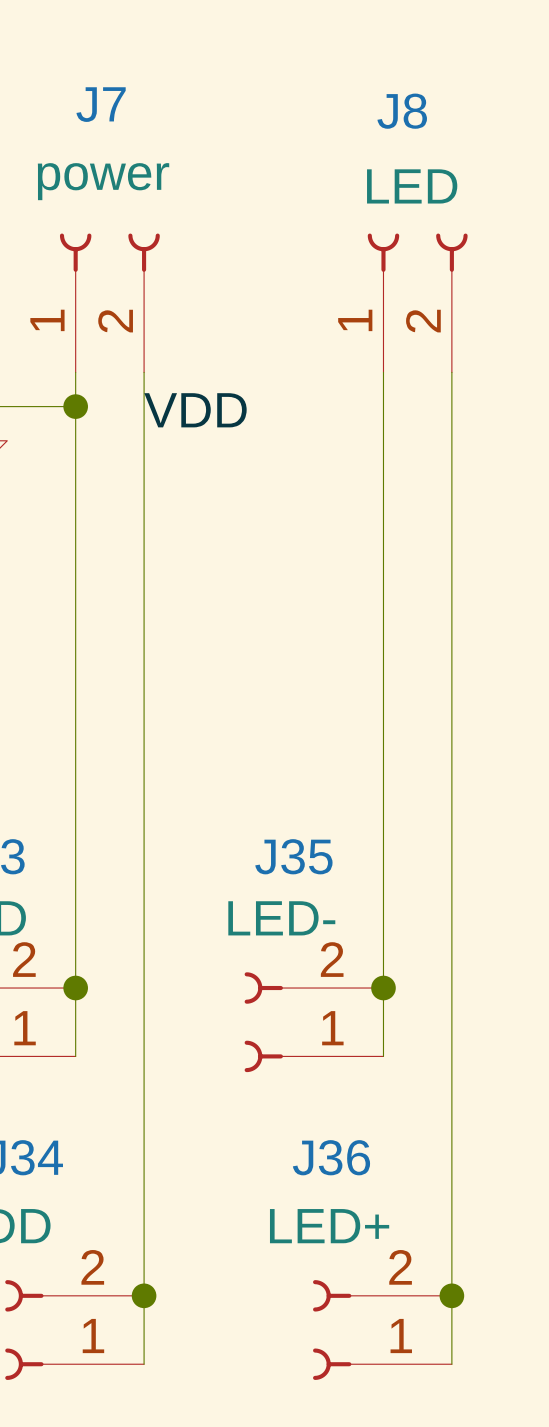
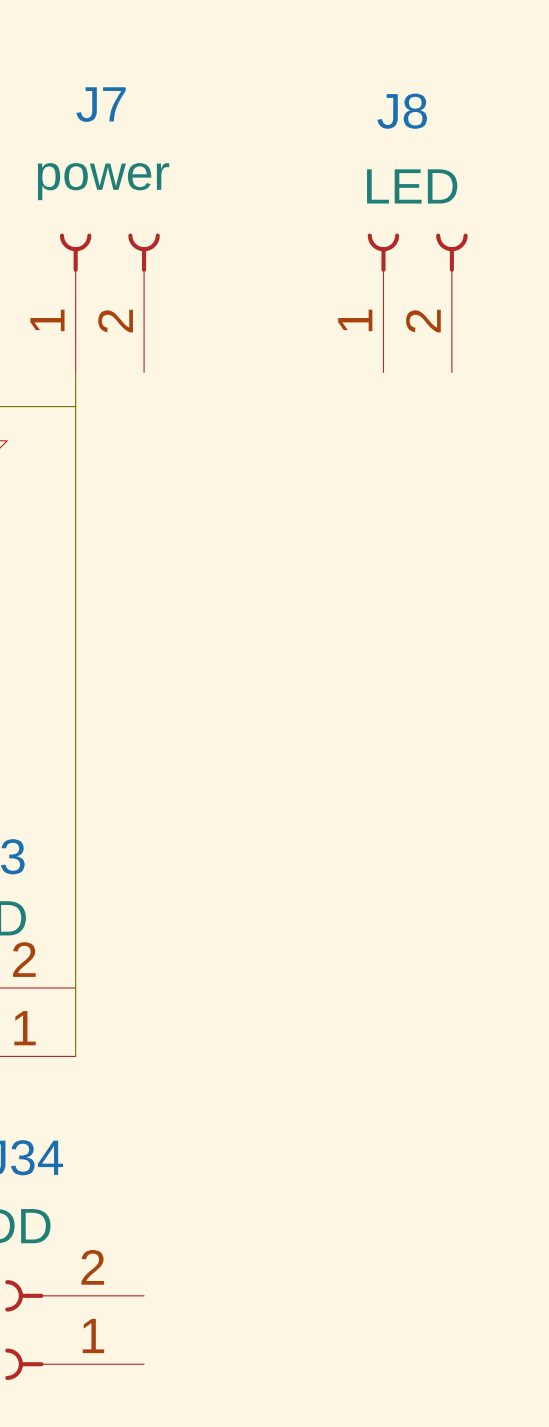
wire: (144, 372) (144, 1364) -> none
wire: (383, 372) (383, 1056) -> none
wire: (451, 372) (451, 1364) -> none
junction: (75, 406) -> none
label: VDD (195, 410) -> none
junction: (75, 988) -> none
junction: (383, 988) -> none
J35: LED- (314, 1022) -> none
junction: (144, 1295) -> none
junction: (451, 1295) -> none
J36: LED+ (382, 1330) -> none

